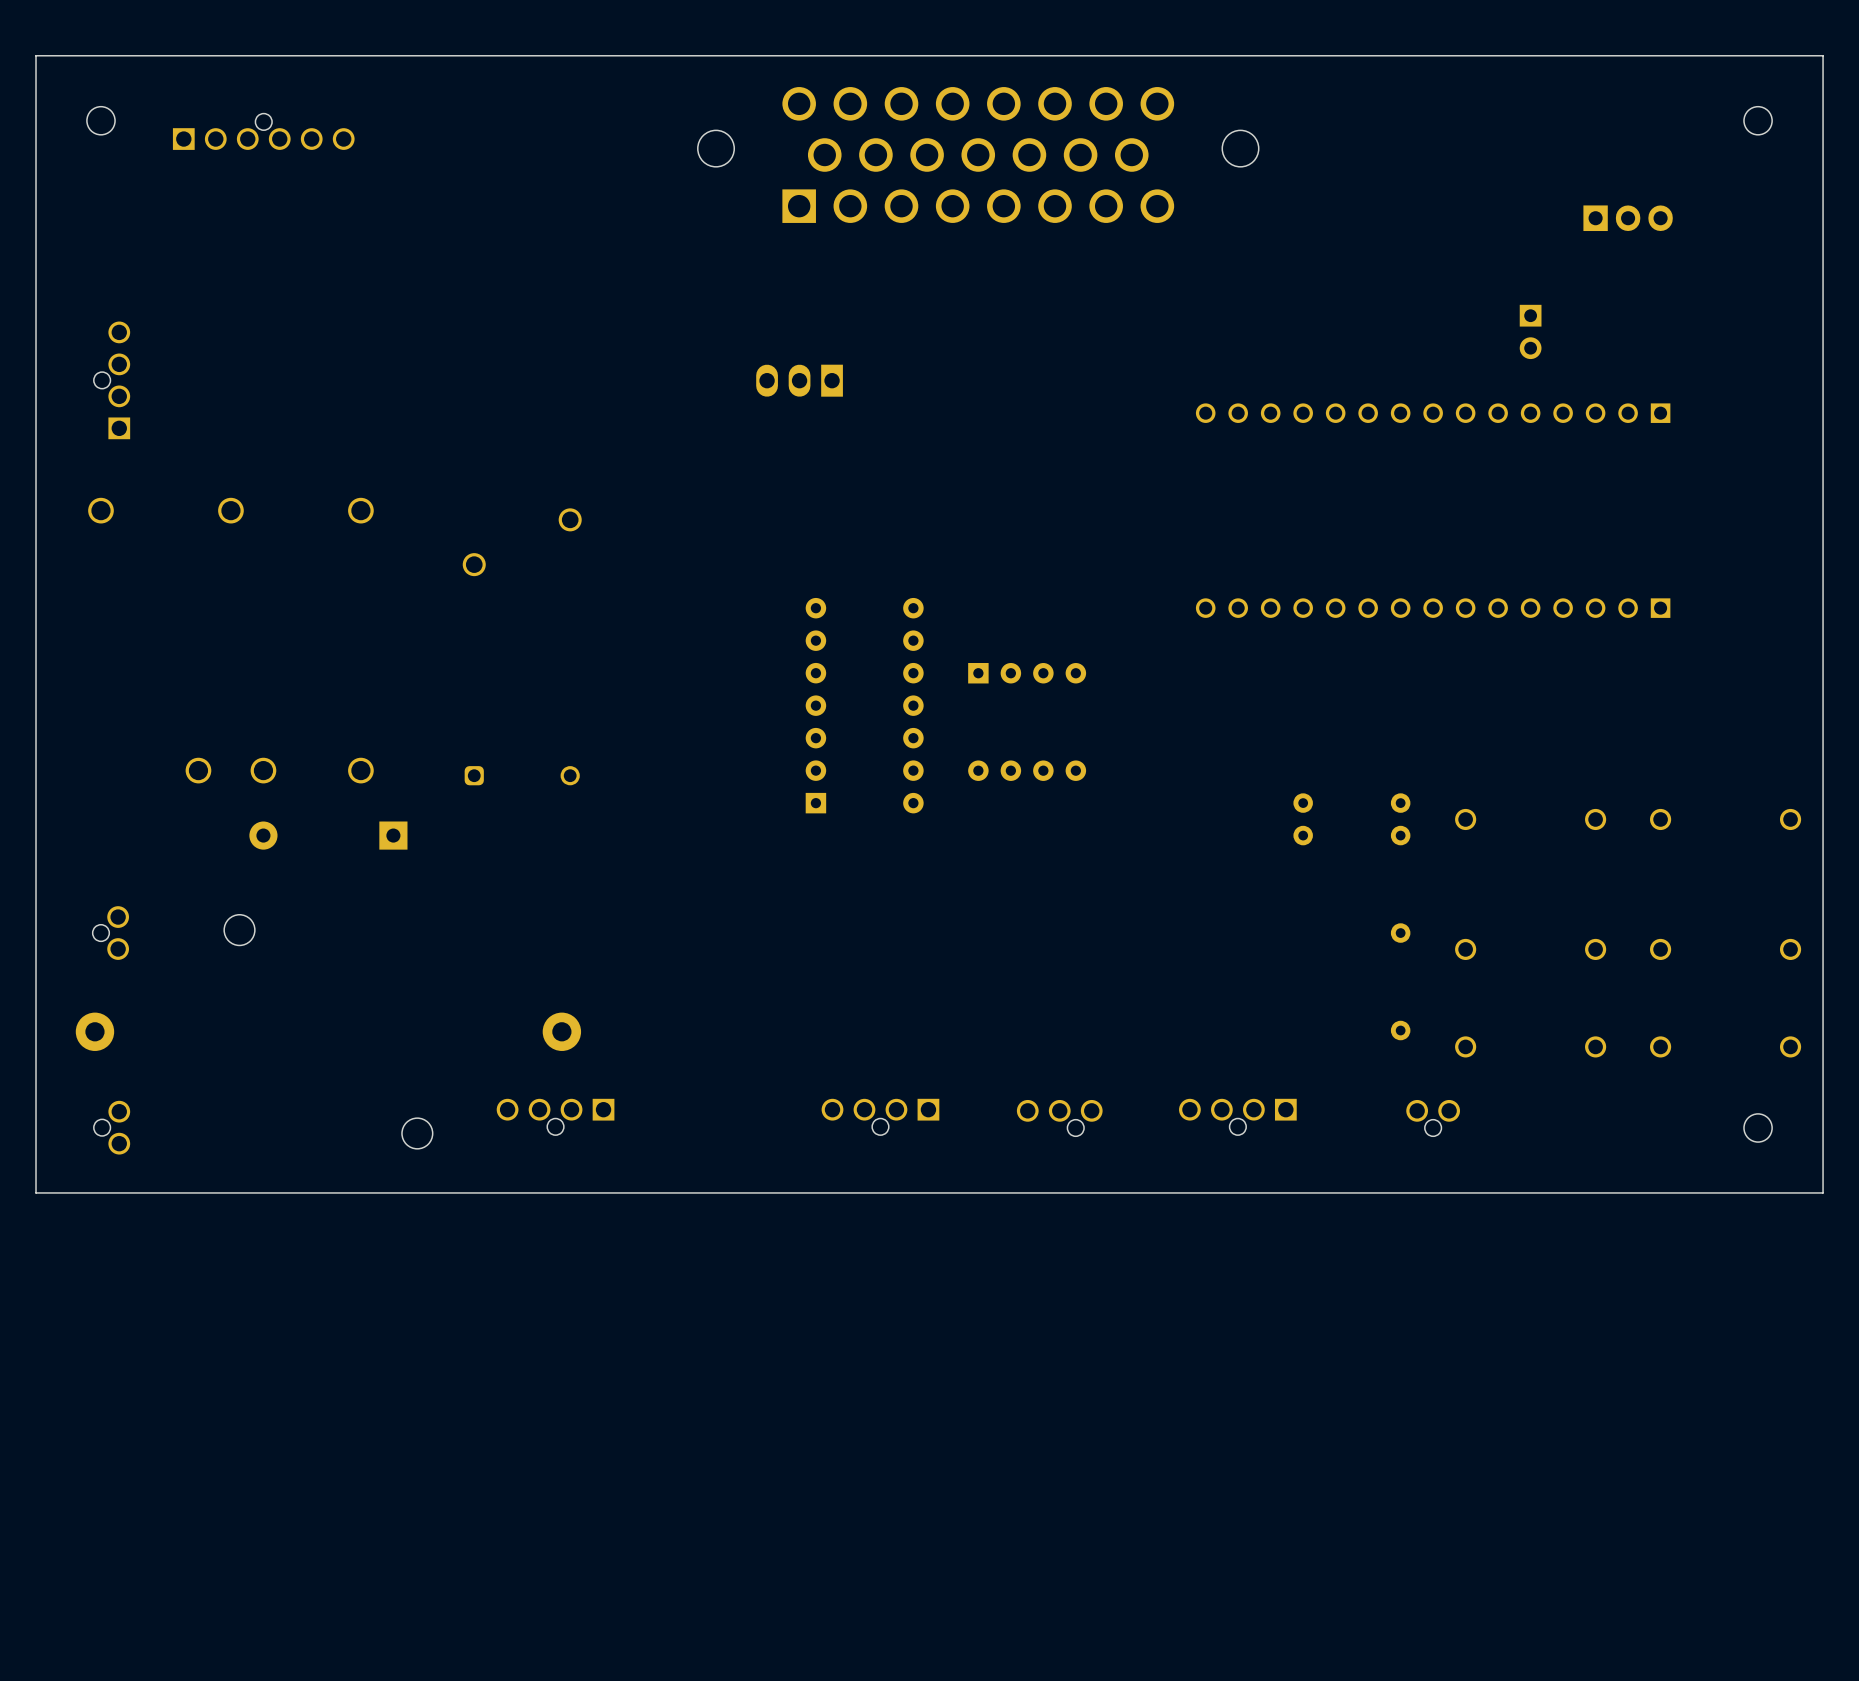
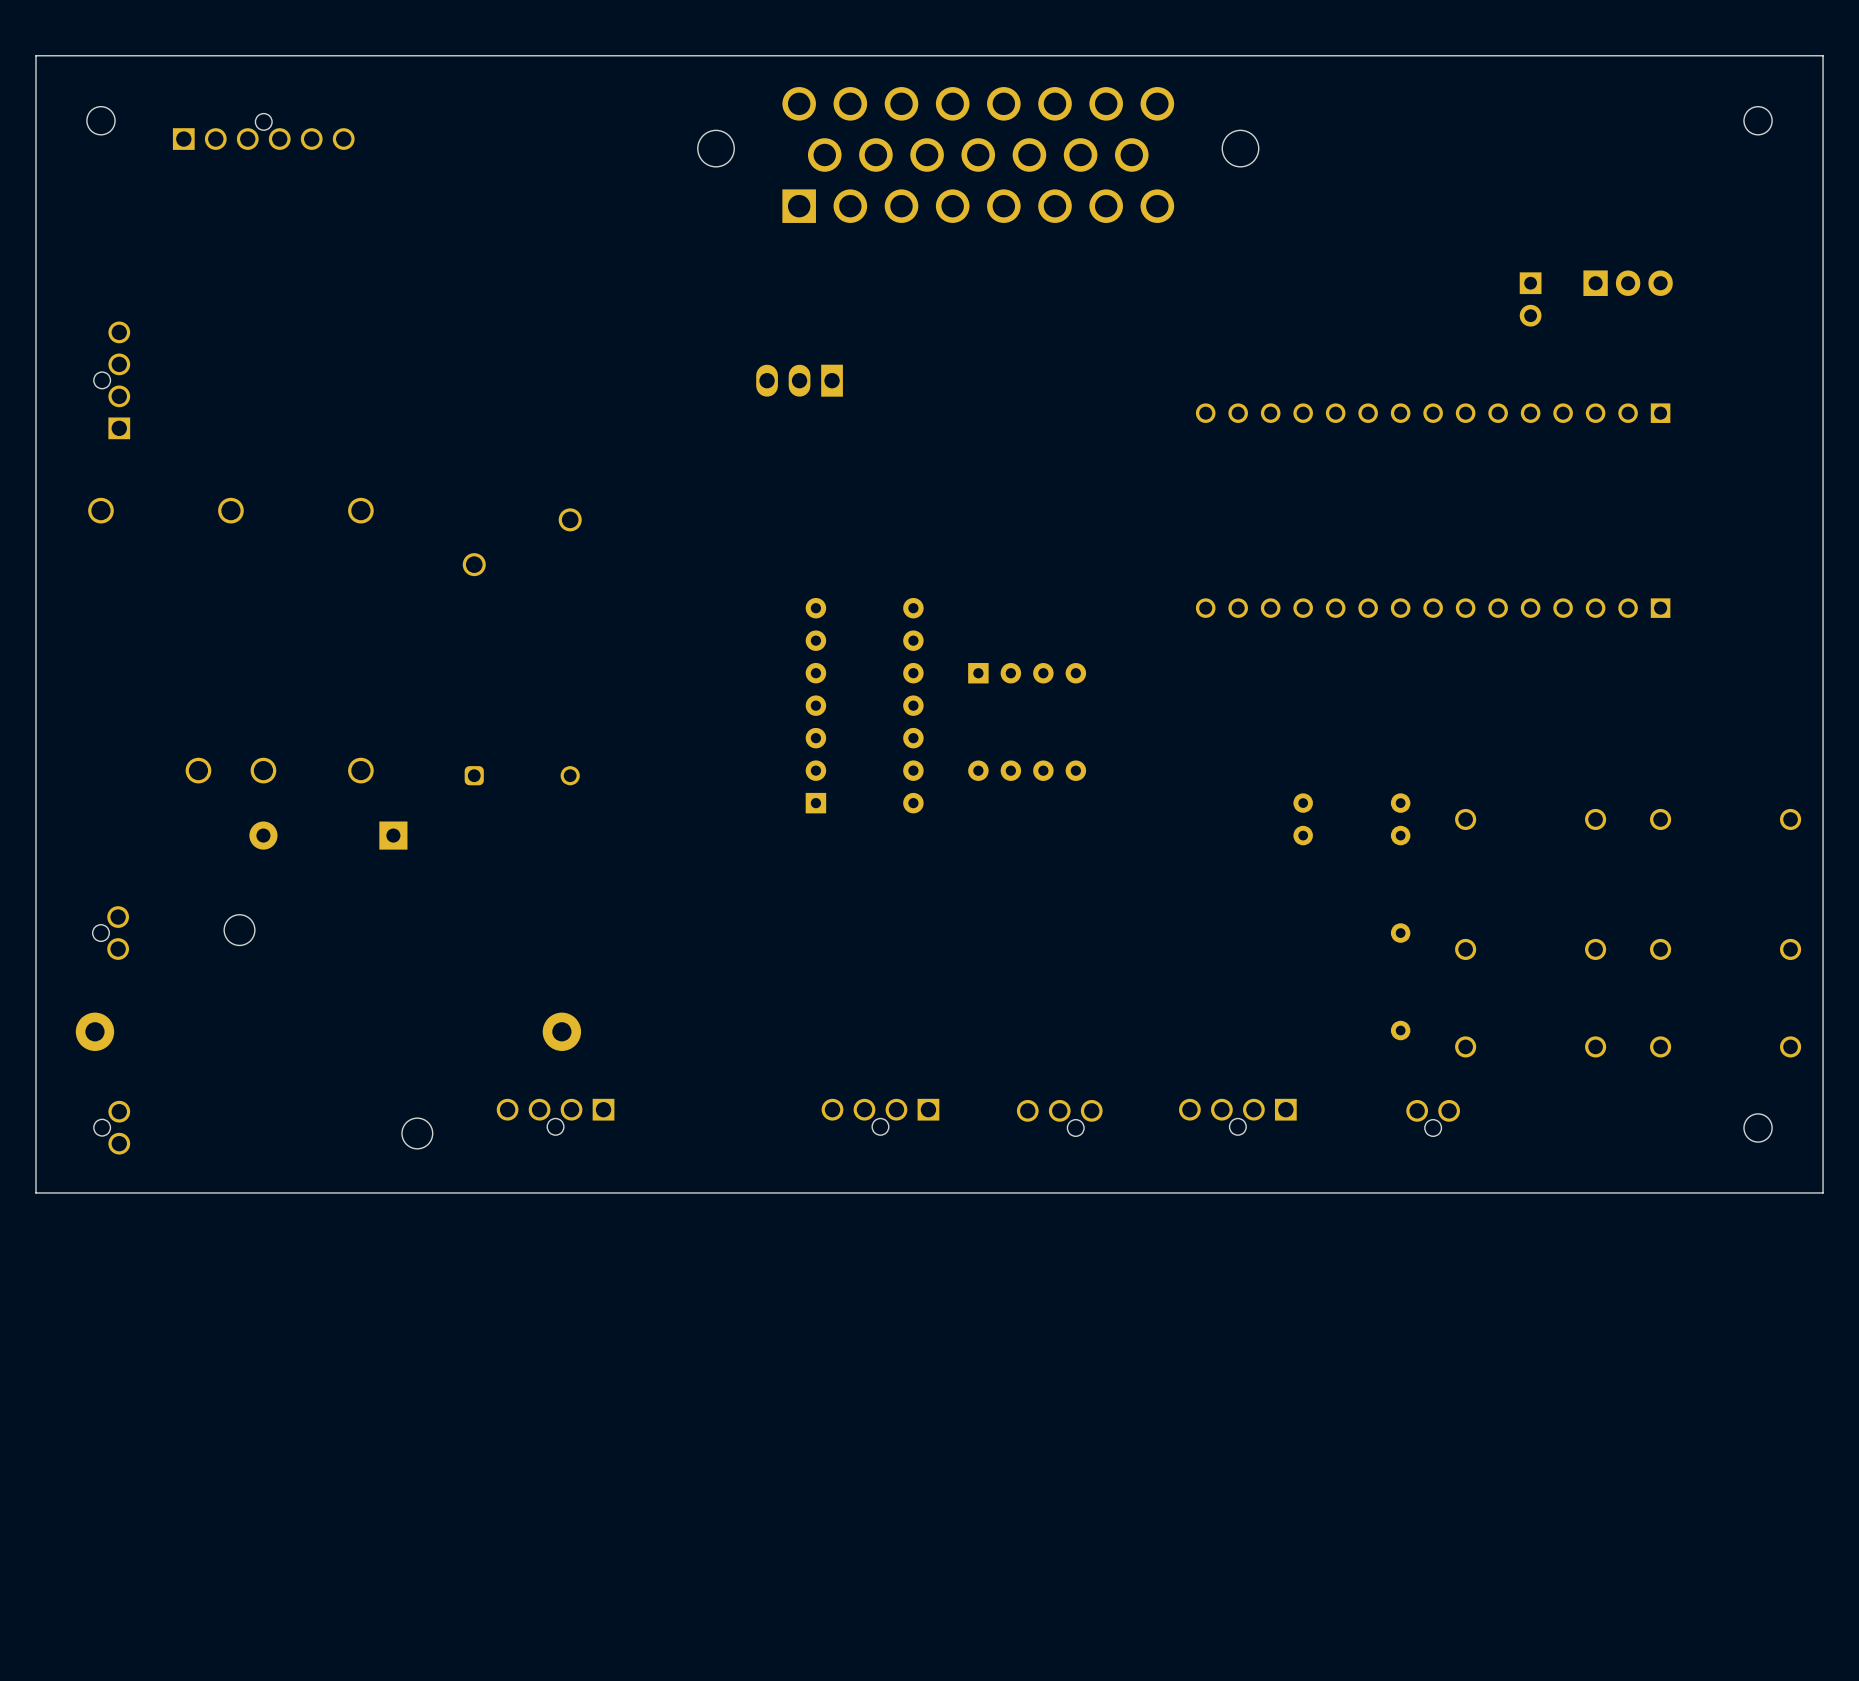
part position: (1628, 218) -> (1628, 283)
part position: (1530, 331) -> (1530, 299)

